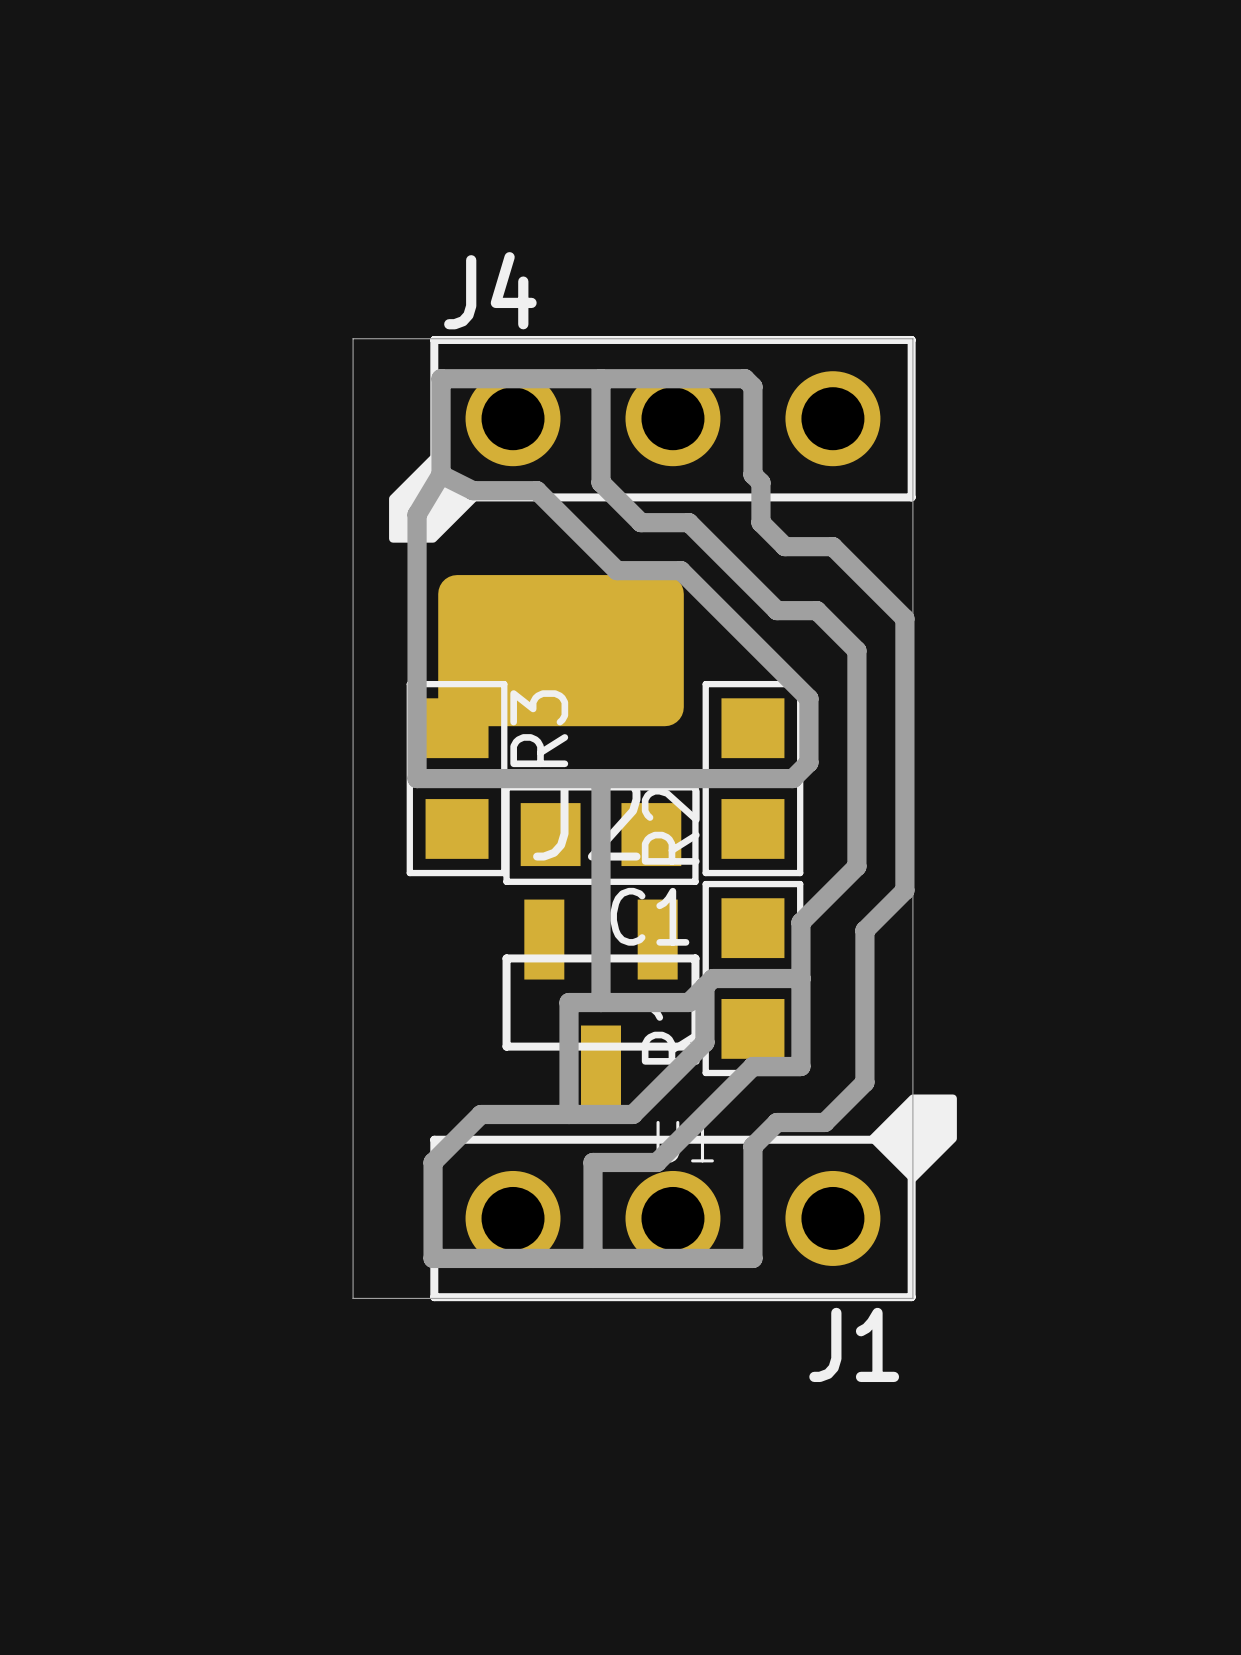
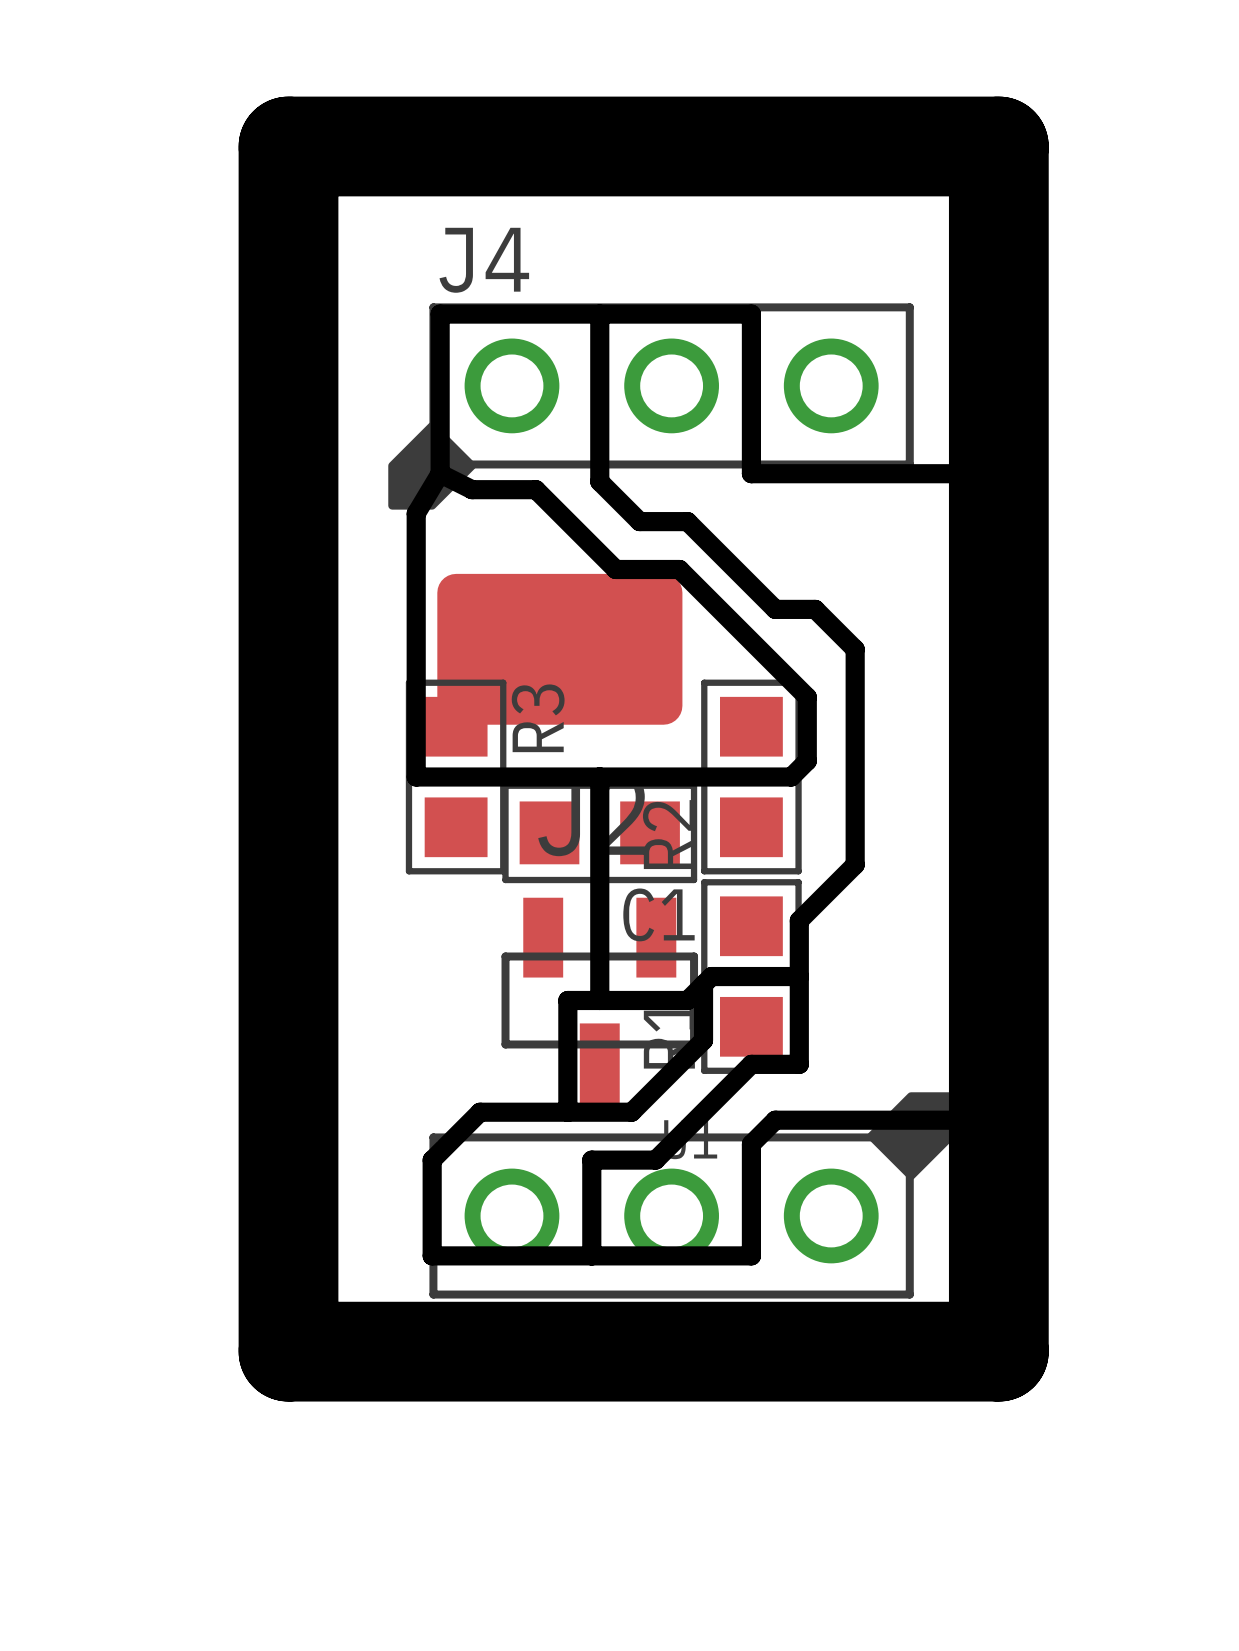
board edge: none -> (599, 314) (599, 377)
board edge: (353, 338) (912, 338) (912, 1298) (353, 1298) (353, 338) -> (288, 146) (288, 1351) (998, 1351) (998, 146) (288, 146)
board edge: (441, 378) (744, 378) (752, 386) -> (440, 377) (440, 314) (751, 314) (751, 385)
J4 position: (652, 439) -> (651, 406)
board edge: (752, 474) (760, 482) (760, 522) (784, 546) (832, 546) (904, 618) (904, 890) (864, 930) (864, 1082) (824, 1122) -> (751, 473) (982, 473)
board edge: none -> (823, 1120) (974, 1120)

